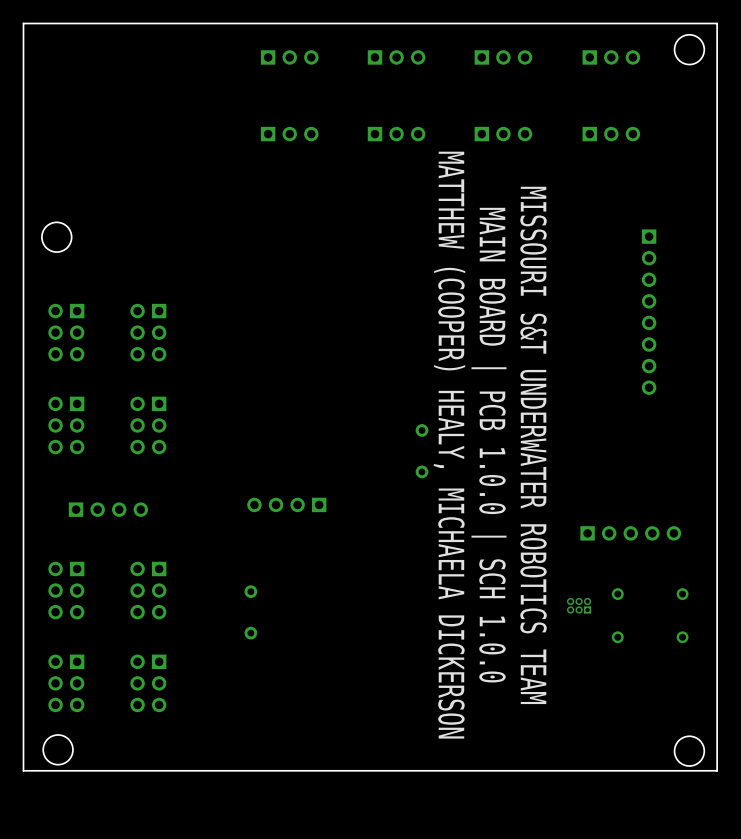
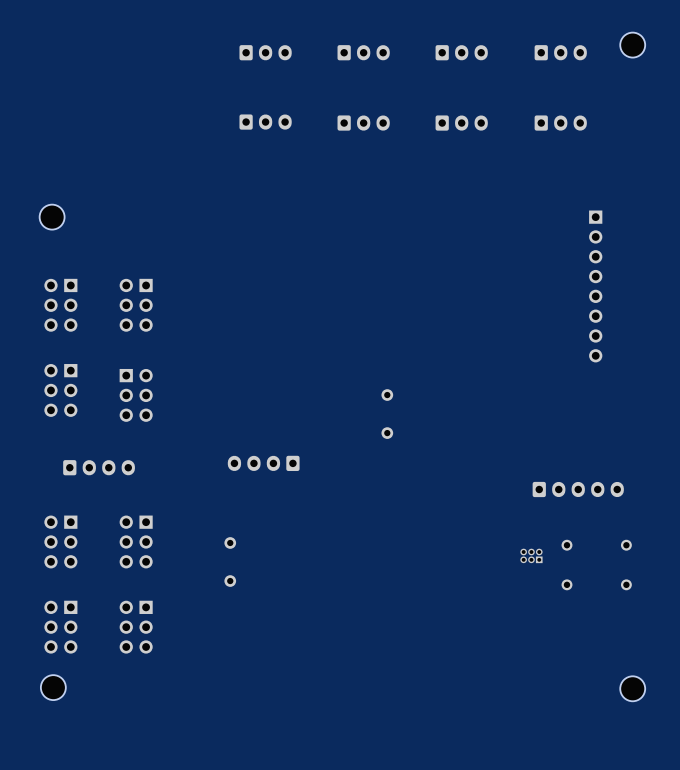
board edge: (717, 23) (717, 770) (23, 770) (23, 23) (717, 23) -> none
round board edge: [673, 33, 706, 66] -> none
part: none -> (632, 45)
part footprint: [260, 50, 319, 65] -> [239, 45, 292, 61]
part footprint: [367, 50, 426, 65] -> [337, 45, 390, 61]
part footprint: [474, 50, 533, 65] -> [435, 45, 488, 61]
part footprint: [582, 50, 641, 65] -> [534, 45, 587, 61]
part footprint: [260, 126, 319, 142] -> [239, 114, 292, 130]
part footprint: [367, 126, 426, 142] -> [337, 115, 390, 131]
part footprint: [474, 126, 533, 142] -> [435, 115, 488, 131]
part footprint: [582, 126, 641, 142] -> [534, 115, 587, 131]
round board edge: [41, 221, 73, 253] -> none
part: none -> (52, 217)
part footprint: [130, 396, 167, 455] -> [119, 368, 153, 422]
text: MATTHEW (COOPER) HEALY, MICHAELA DICKERSON (449, 445) -> none
text: MAIN BOARD | PCB 1.0.0 | SCH 1.0.0 (488, 445) -> none
text: MISSOURI S&T UNDERWATER ROBOTICS TEAM (533, 445) -> none
part footprint: [247, 497, 327, 513] -> [227, 455, 300, 472]
part footprint: [68, 502, 149, 517] -> [63, 460, 135, 476]
part footprint: [580, 526, 682, 541] -> [532, 481, 624, 498]
round board edge: [42, 734, 74, 766] -> none
round board edge: [673, 735, 706, 767] -> none
part: none -> (53, 687)
part: none -> (632, 688)

